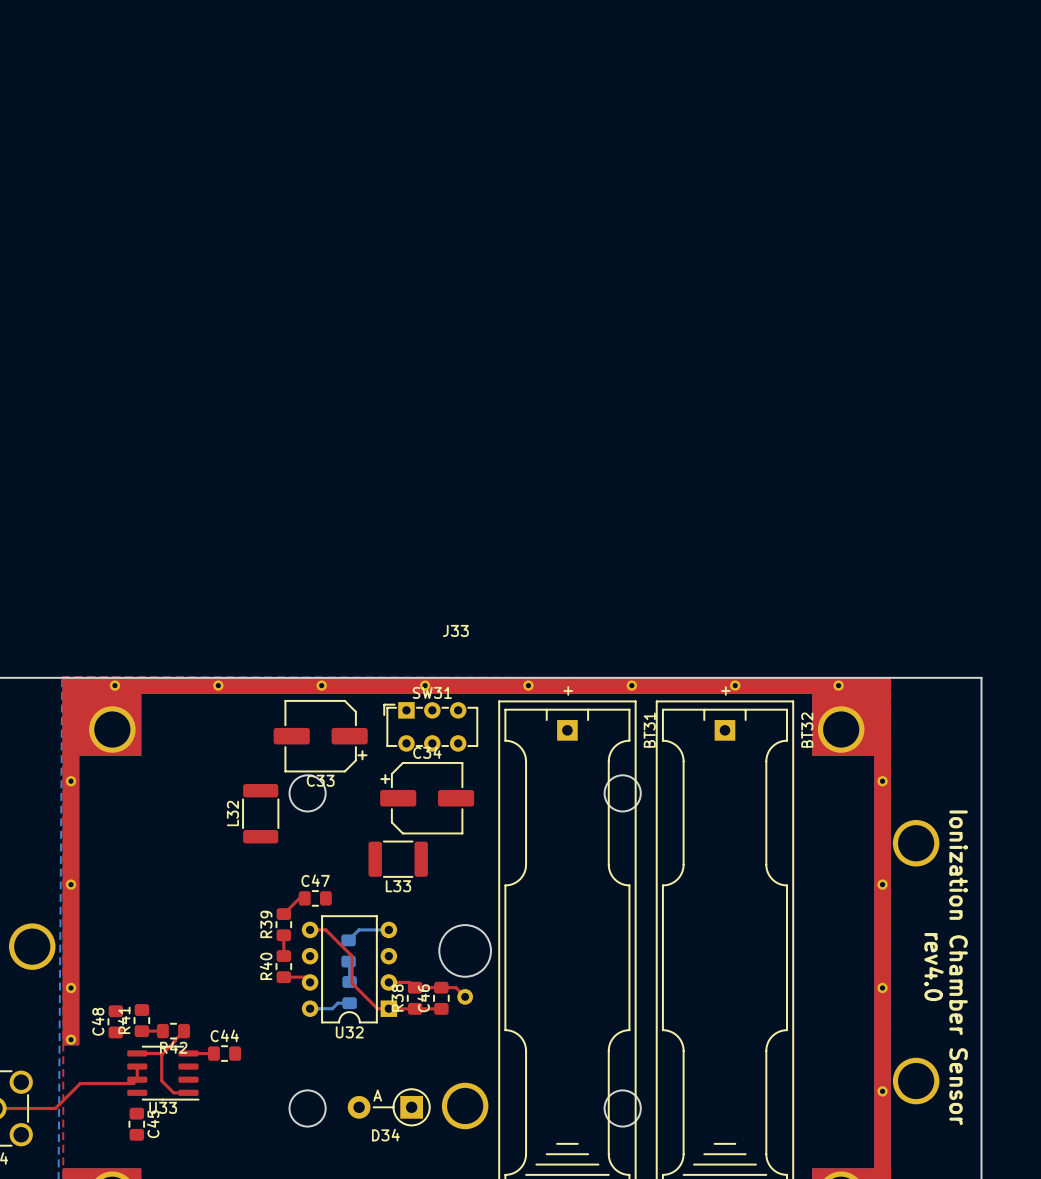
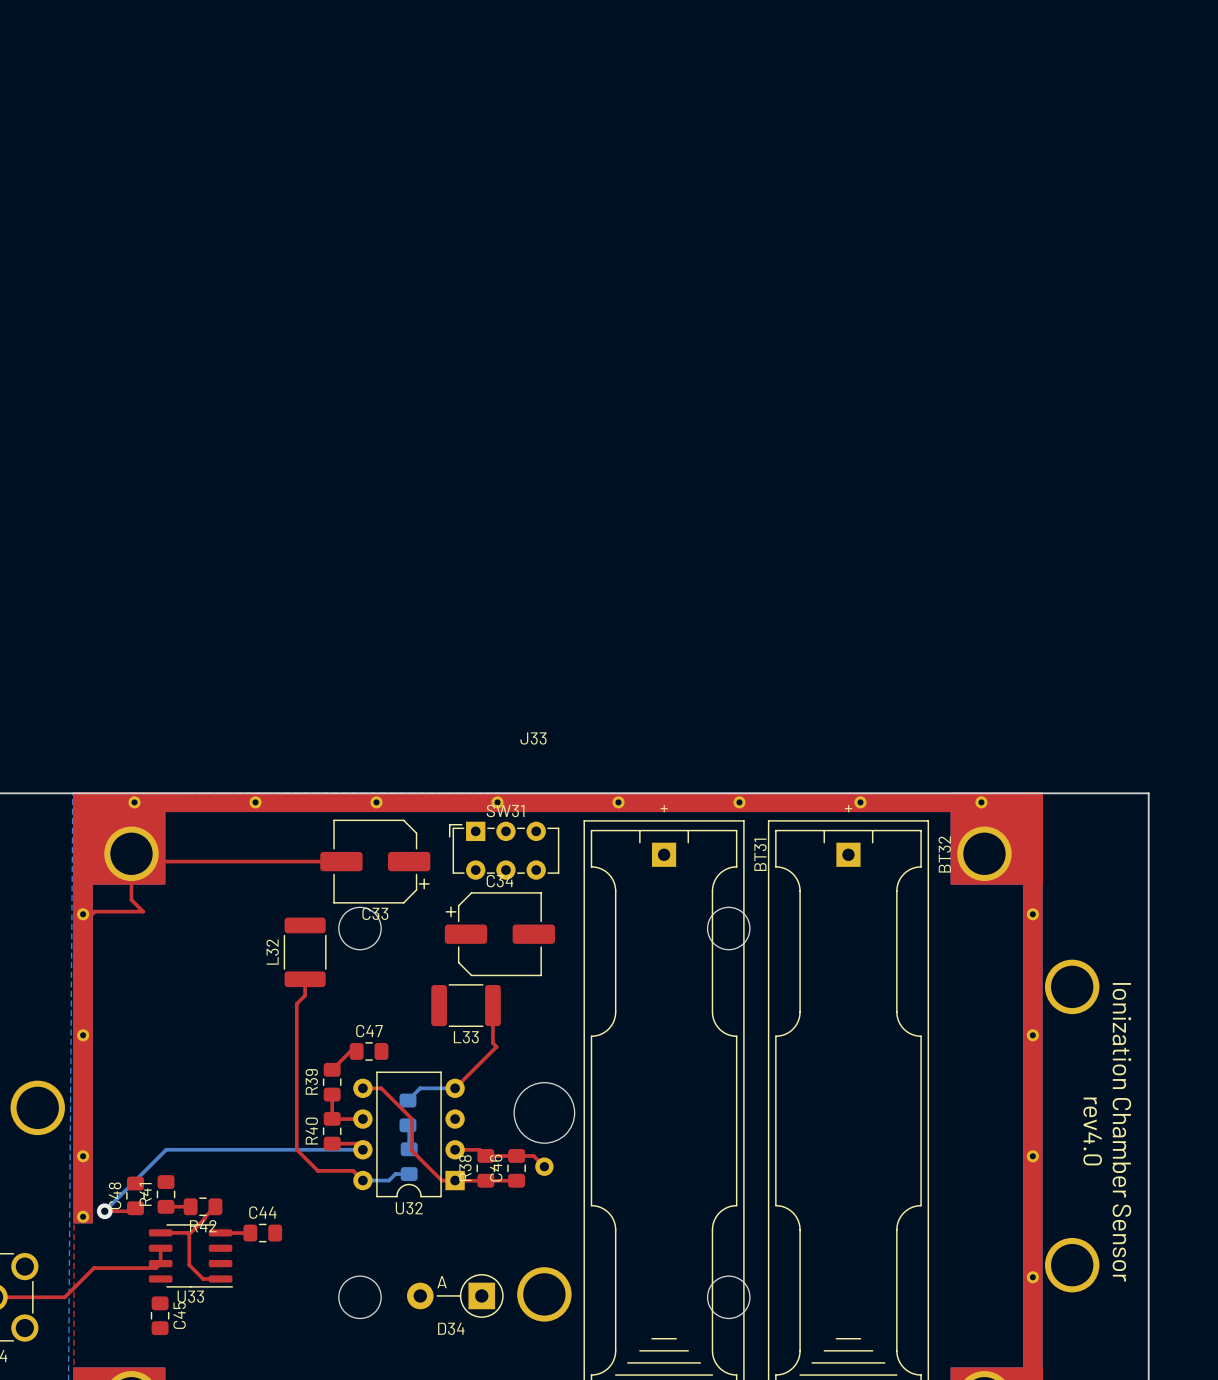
top track: none -> (341, 861) (139, 861) (131, 853) (131, 899) (143, 911) (94, 911) (92, 914) (83, 914)
top track: none -> (305, 979) (305, 995) (296, 1003) (296, 1149) (317, 1170) (353, 1170) (362, 1180)
top track: none -> (492, 1005) (492, 1043) (496, 1046) (455, 1088)
top track: none -> (332, 1118) (362, 1119)
bottom track: none -> (362, 1149) (166, 1149) (104, 1211)
top track: none -> (135, 1208) (132, 1211) (104, 1211)
via: none -> (104, 1211)

